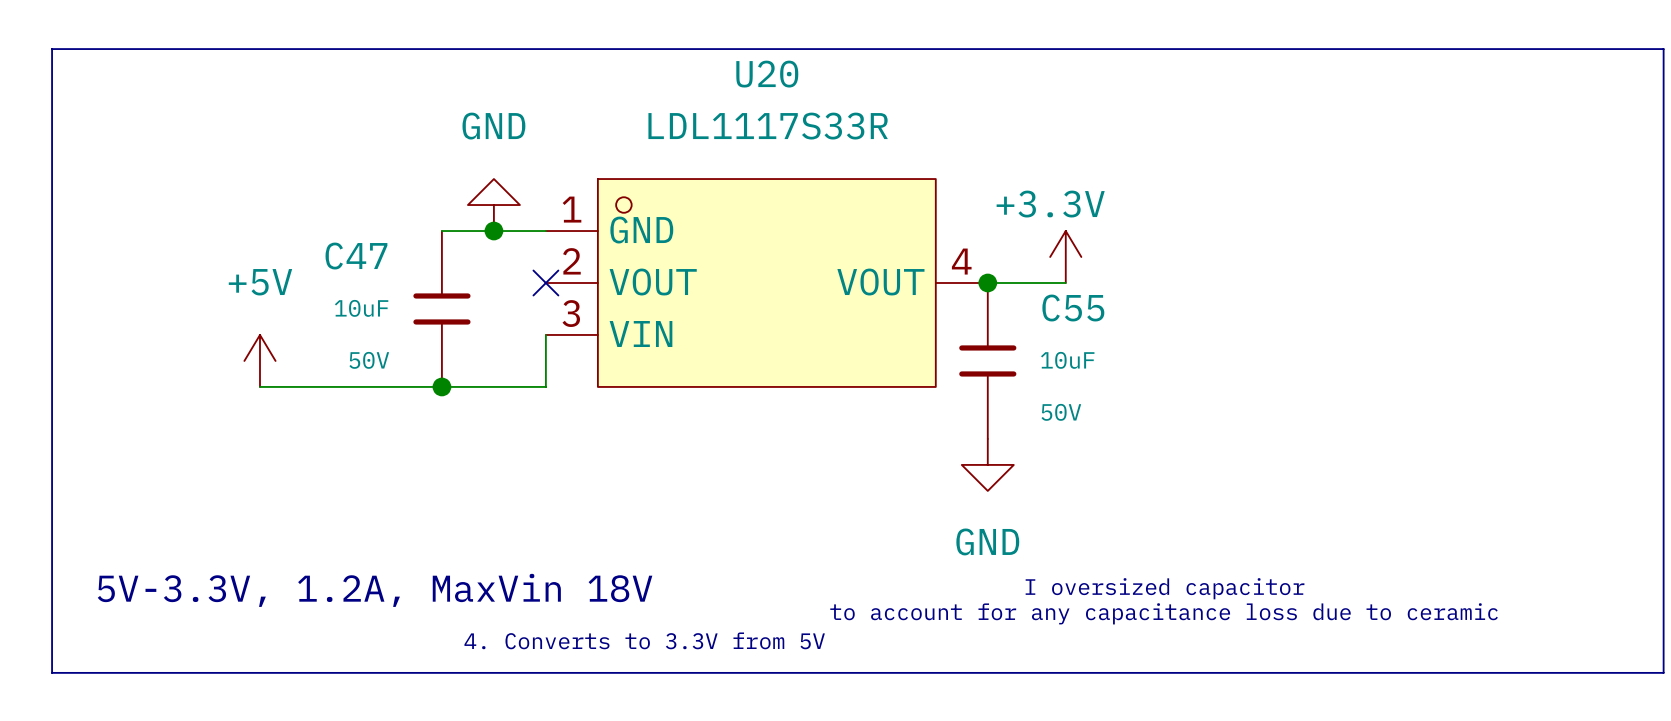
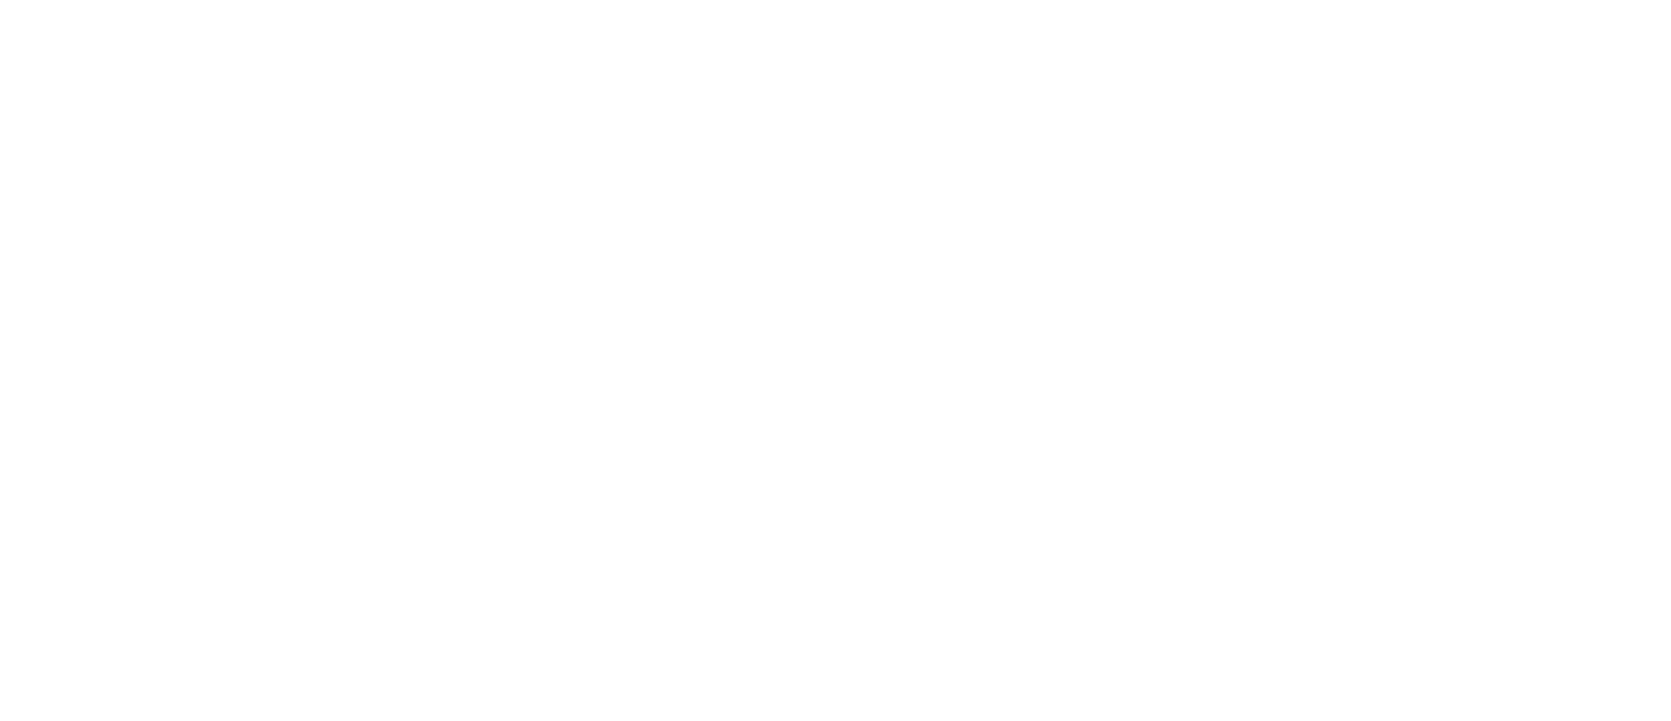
line: (52, 49) (1663, 49) (1663, 672) (52, 672) (52, 49) -> none
power symbol: GND (493, 205) -> none
wire: (441, 231) (545, 231) -> none
junction: (493, 231) -> none
power symbol: +3.3V (1065, 257) -> none
no-connect mark: (545, 282) -> none
U20: LDL1117S33R (766, 282) -> none
wire: (987, 282) (1065, 282) -> none
junction: (987, 282) -> none
C47: 10uF (441, 308) -> none
wire: (545, 334) (545, 386) (259, 386) -> none
power symbol: +5V (259, 360) -> none
C55: 10uF (987, 360) -> none
junction: (441, 386) -> none
power symbol: GND (987, 464) -> none
text: I oversized capacitor (1165, 588) -> none
text: 5V-3.3V, 1.2A, MaxVin 18V (375, 590) -> none
text: to account for any capacitance loss due to ceramic (1164, 613) -> none
text: 4. Converts to 3.3V from 5V (644, 640) -> none

